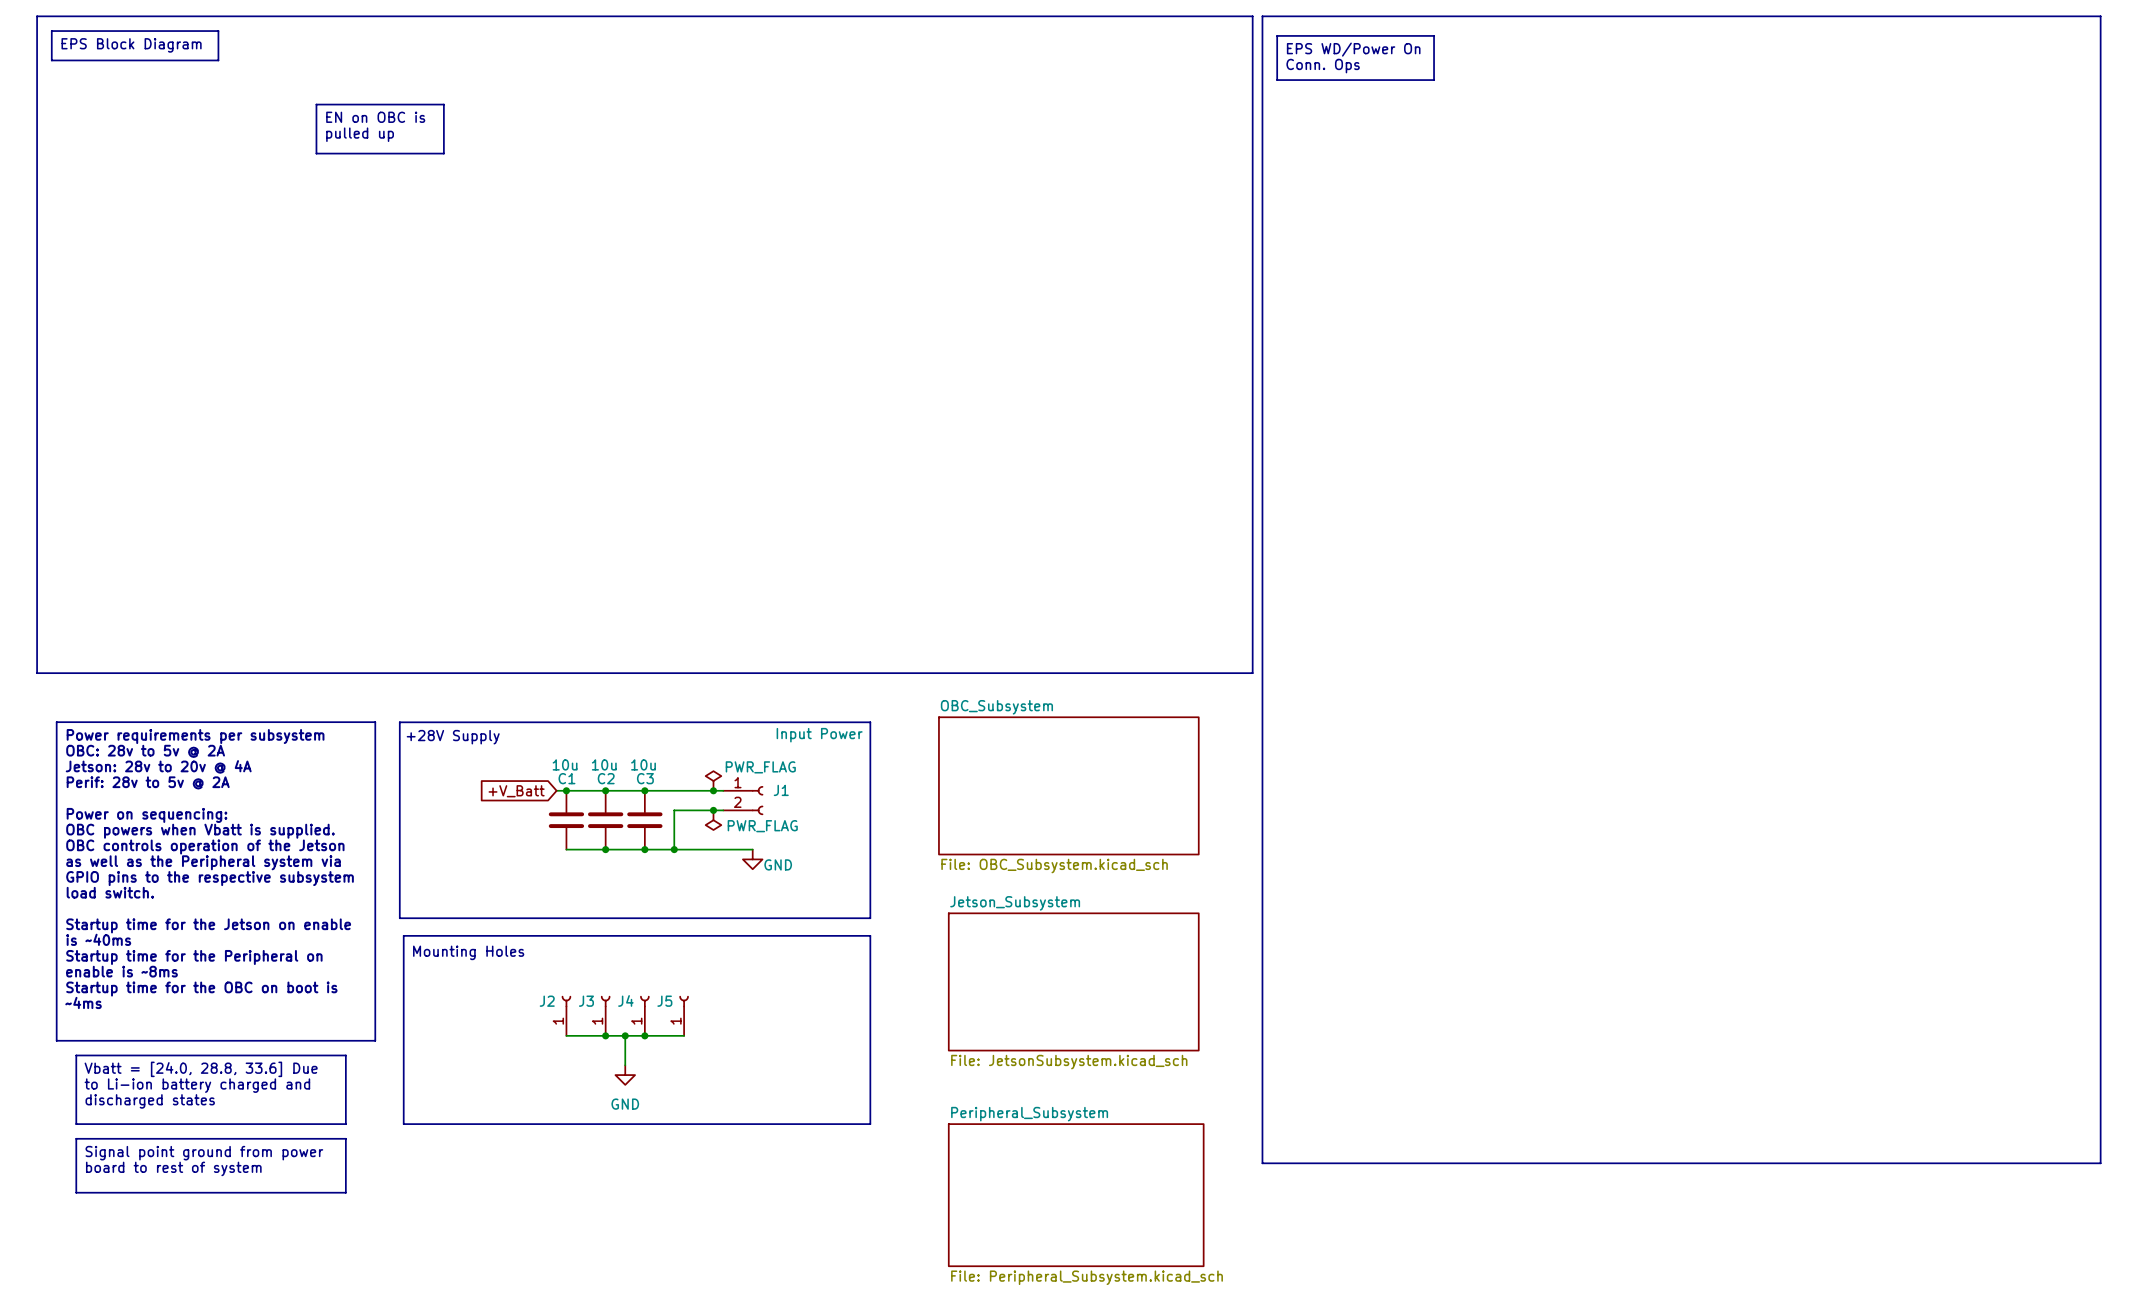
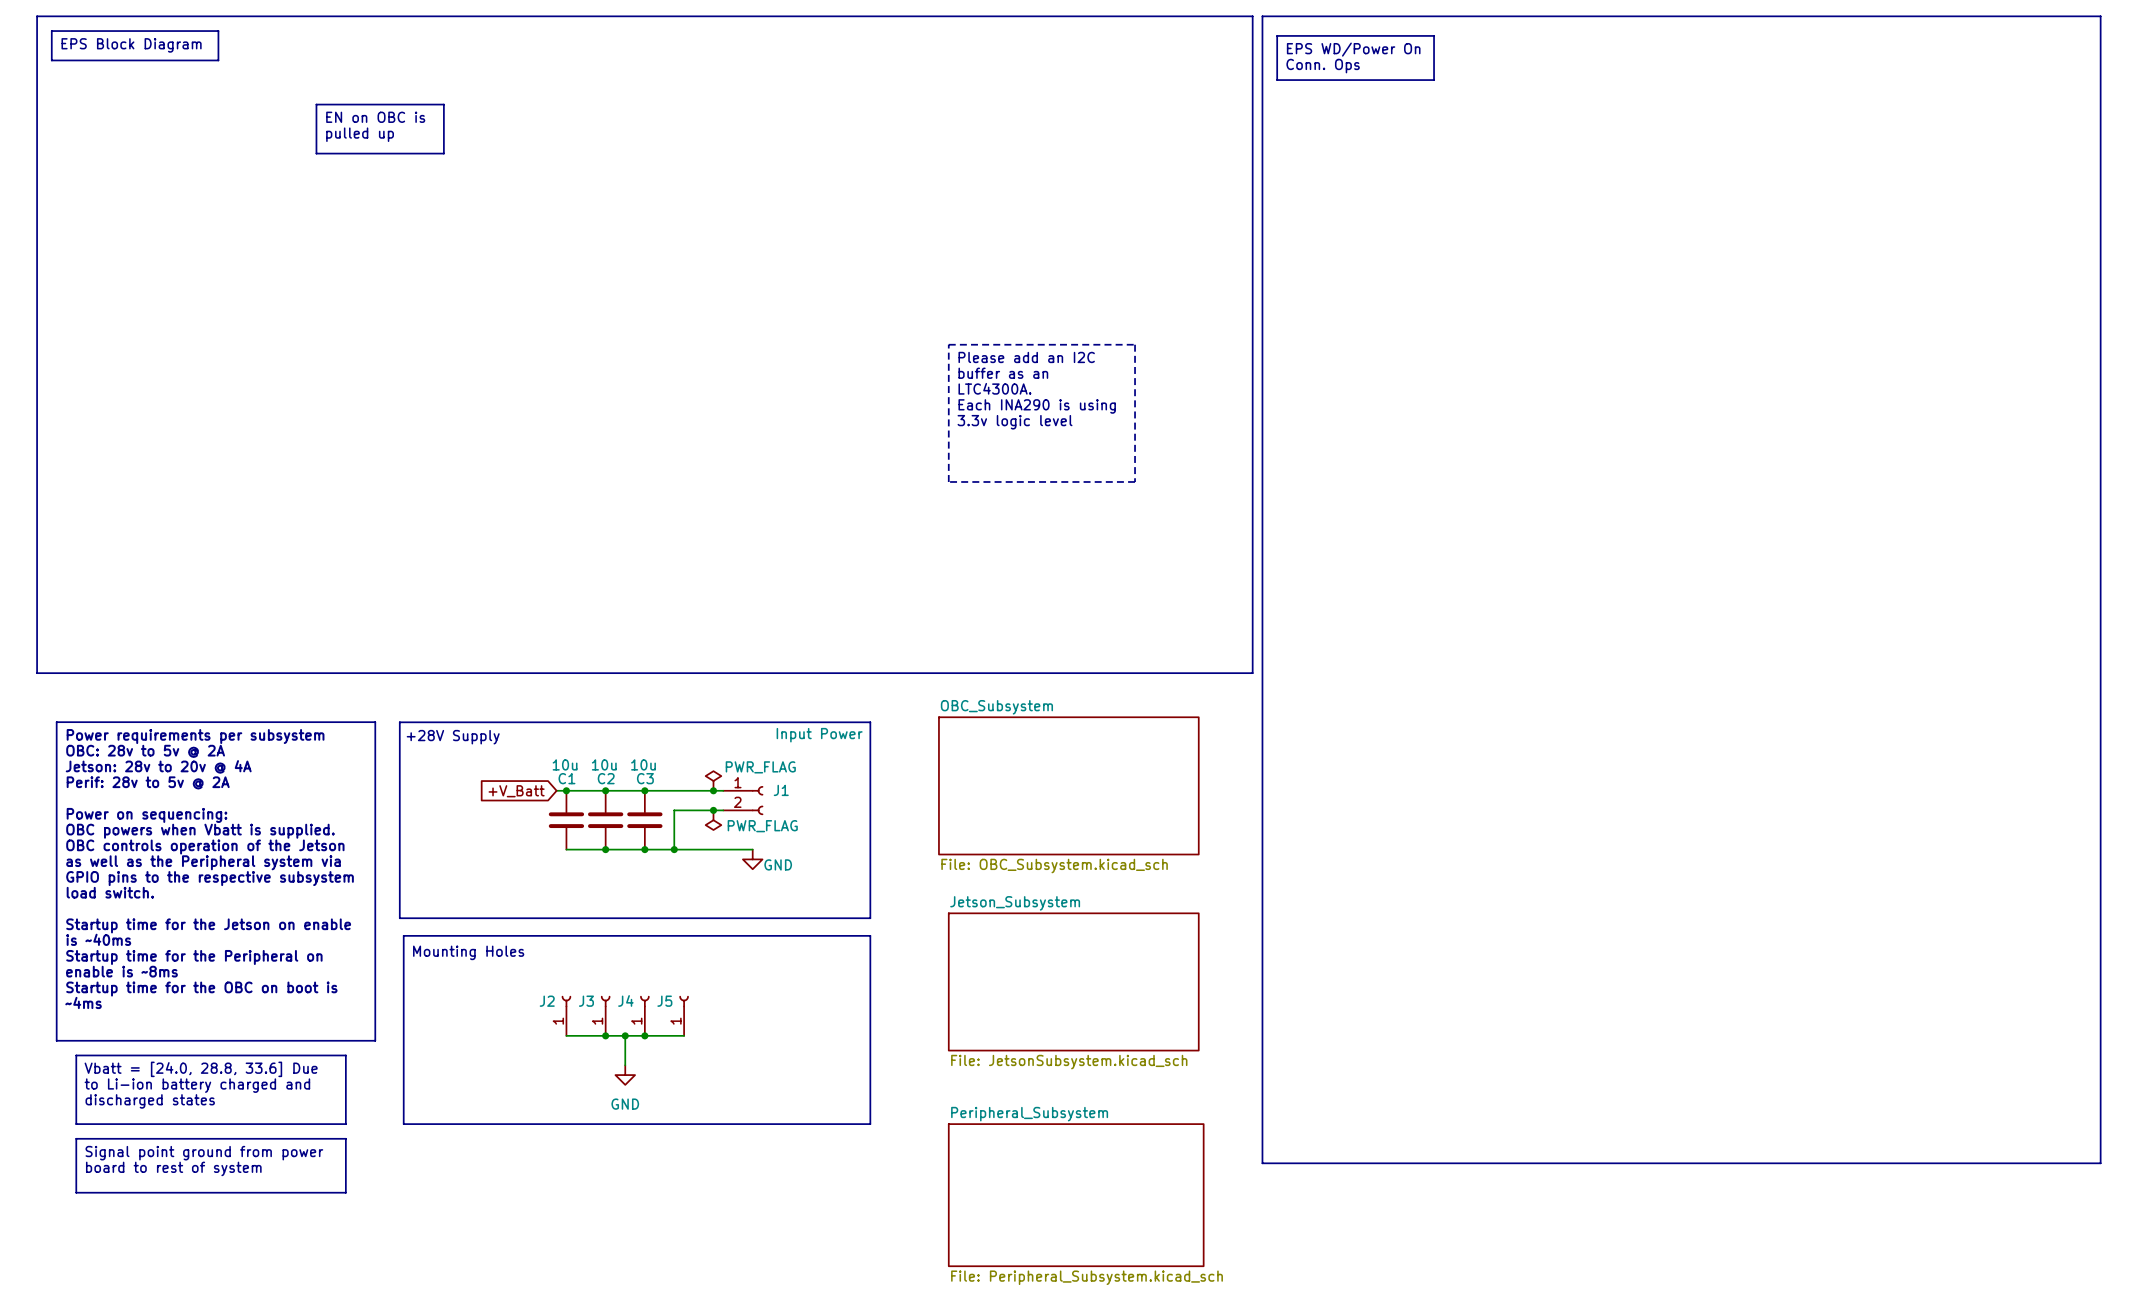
line: none -> (948, 344) (1135, 344) (1135, 481) (948, 481) (948, 344)
text: none -> Please add an I2C (1026, 357)
text: none -> buffer as an (1003, 373)
text: none -> LTC4300A. (994, 388)
text: none -> Each INA290 is using (1037, 406)
text: none -> 3.3v logic level (1015, 422)

